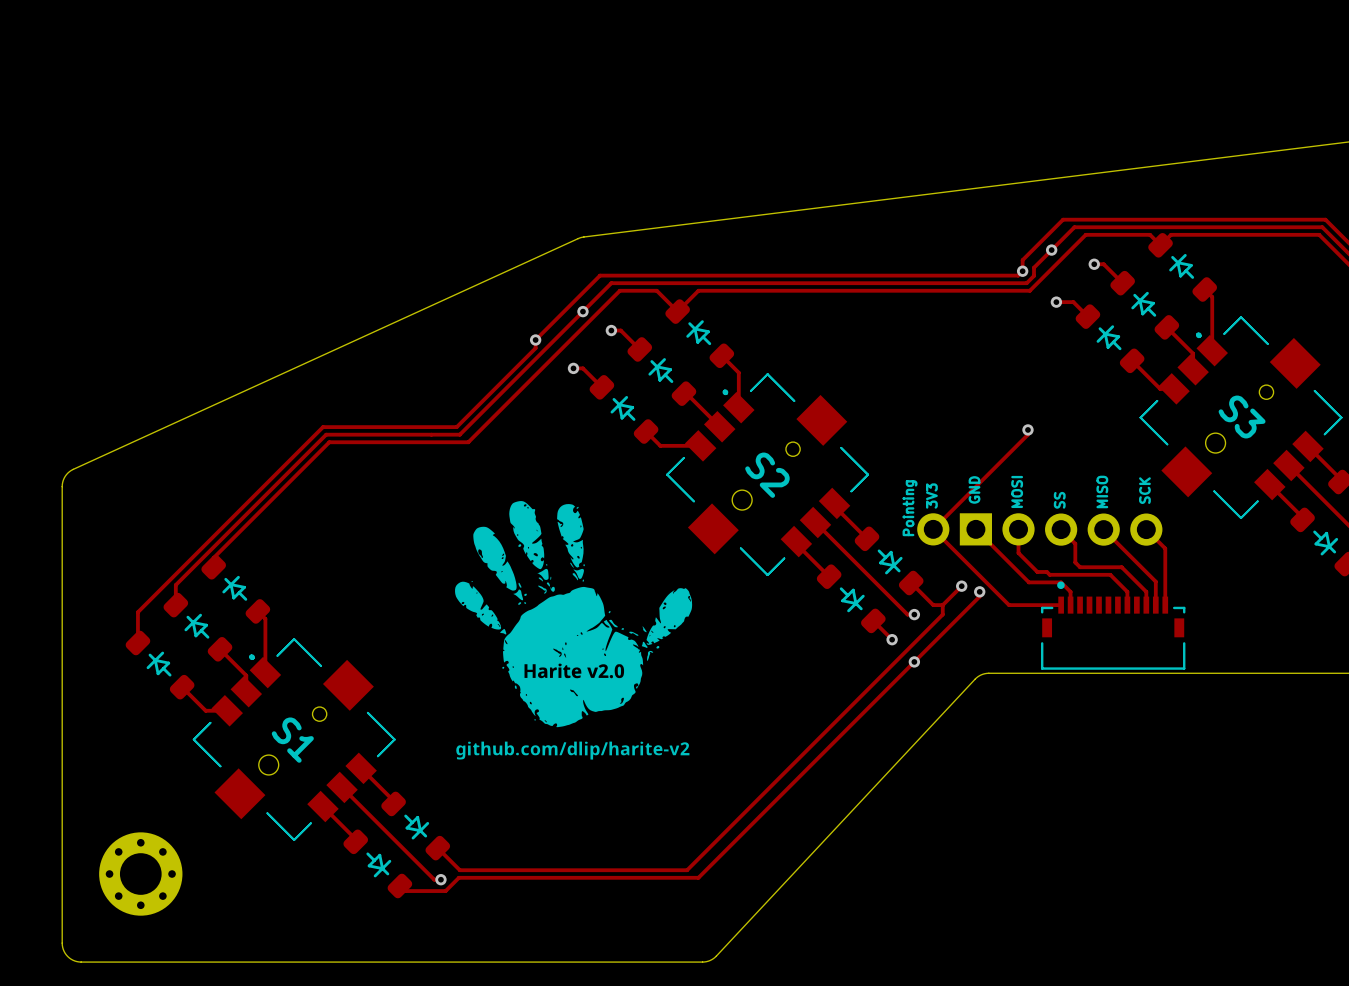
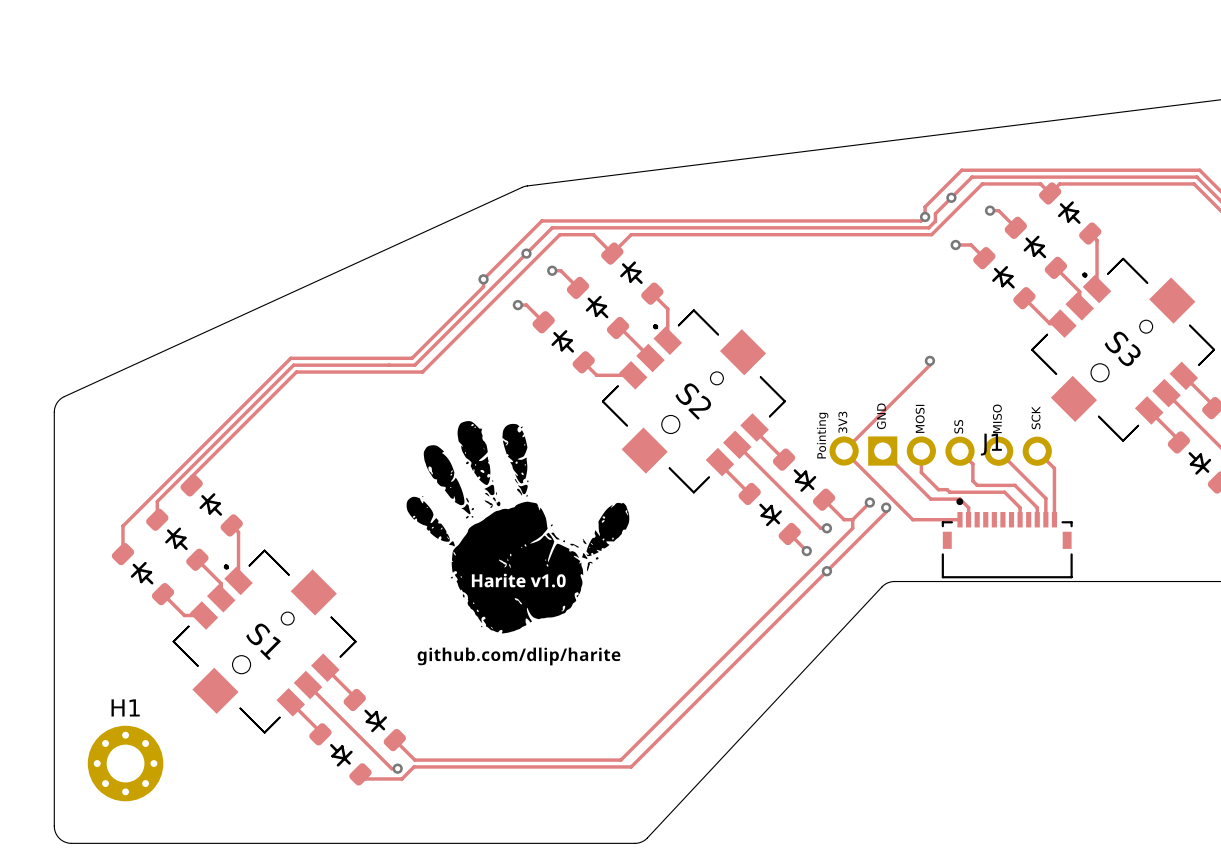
drawing shape: [455, 501, 693, 760] -> [406, 421, 630, 666]
J1 name: none -> J1 (991, 444)
H1 name: none -> H1 (125, 707)

